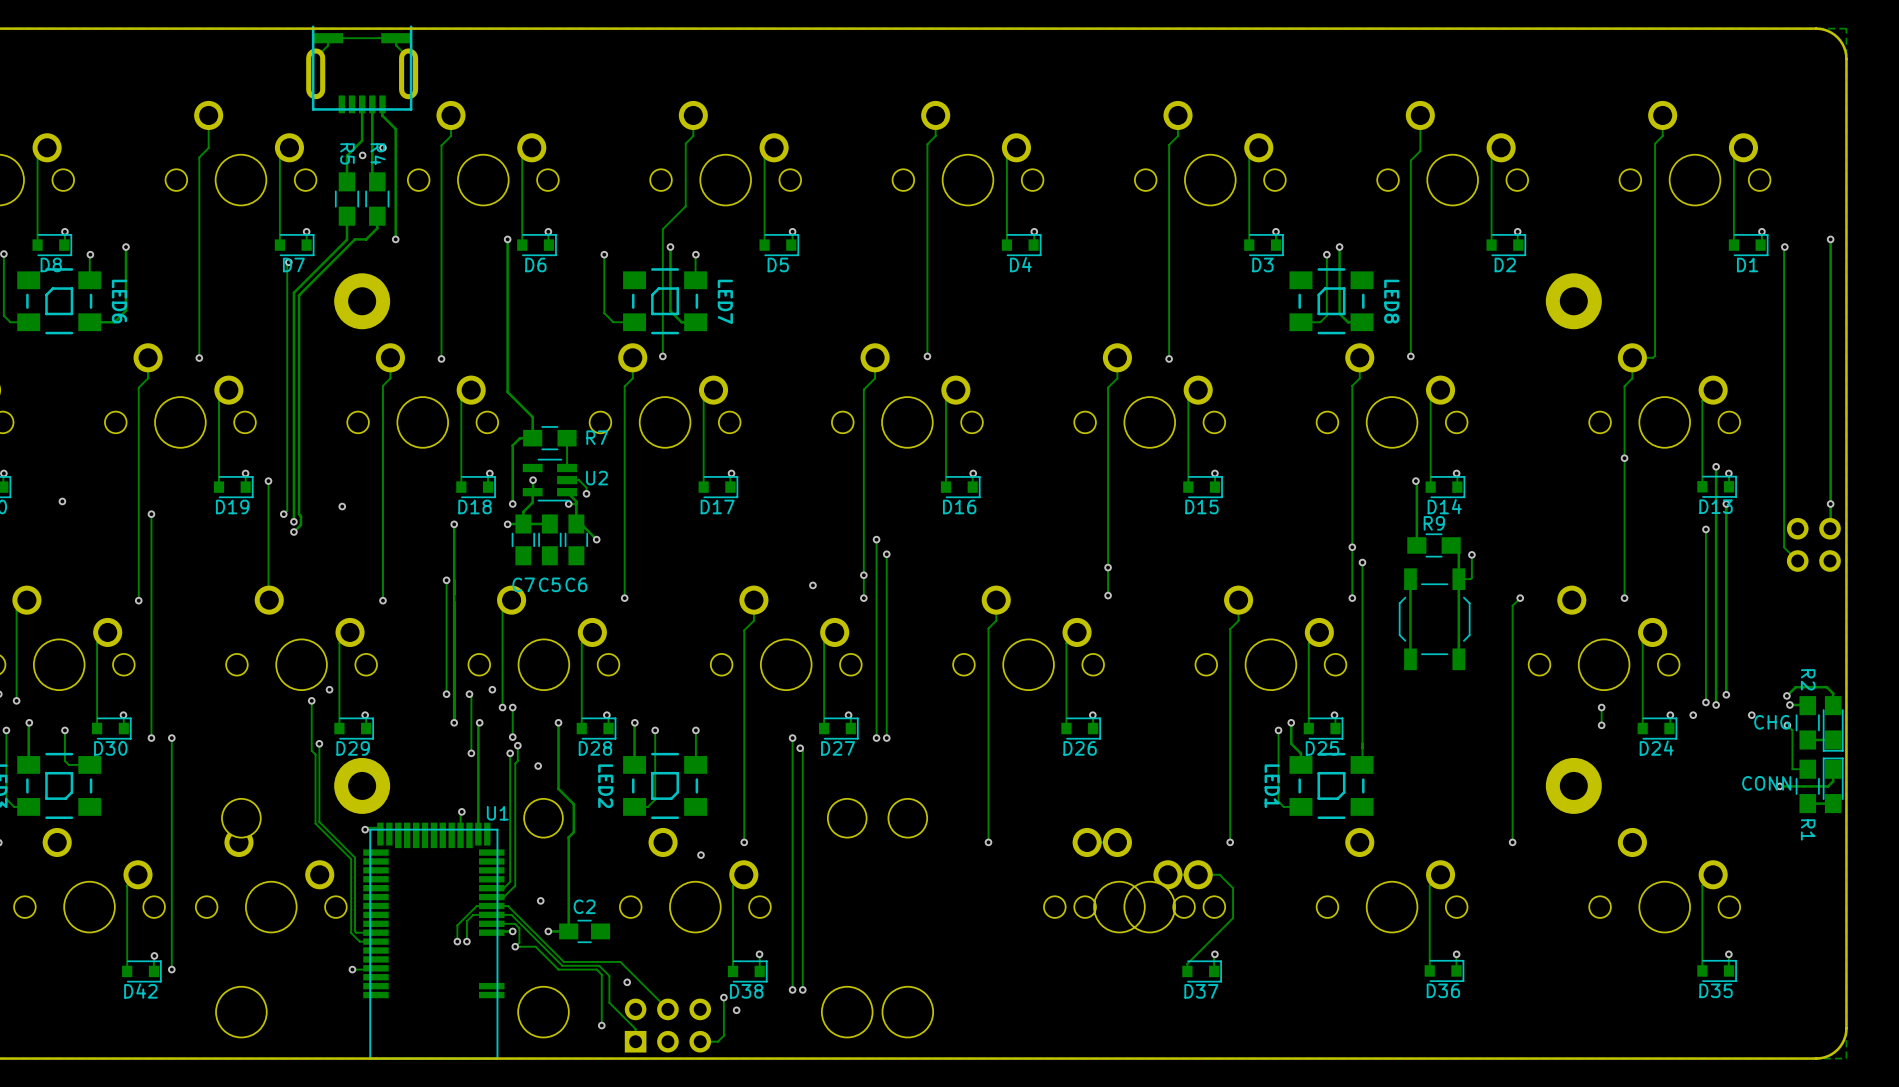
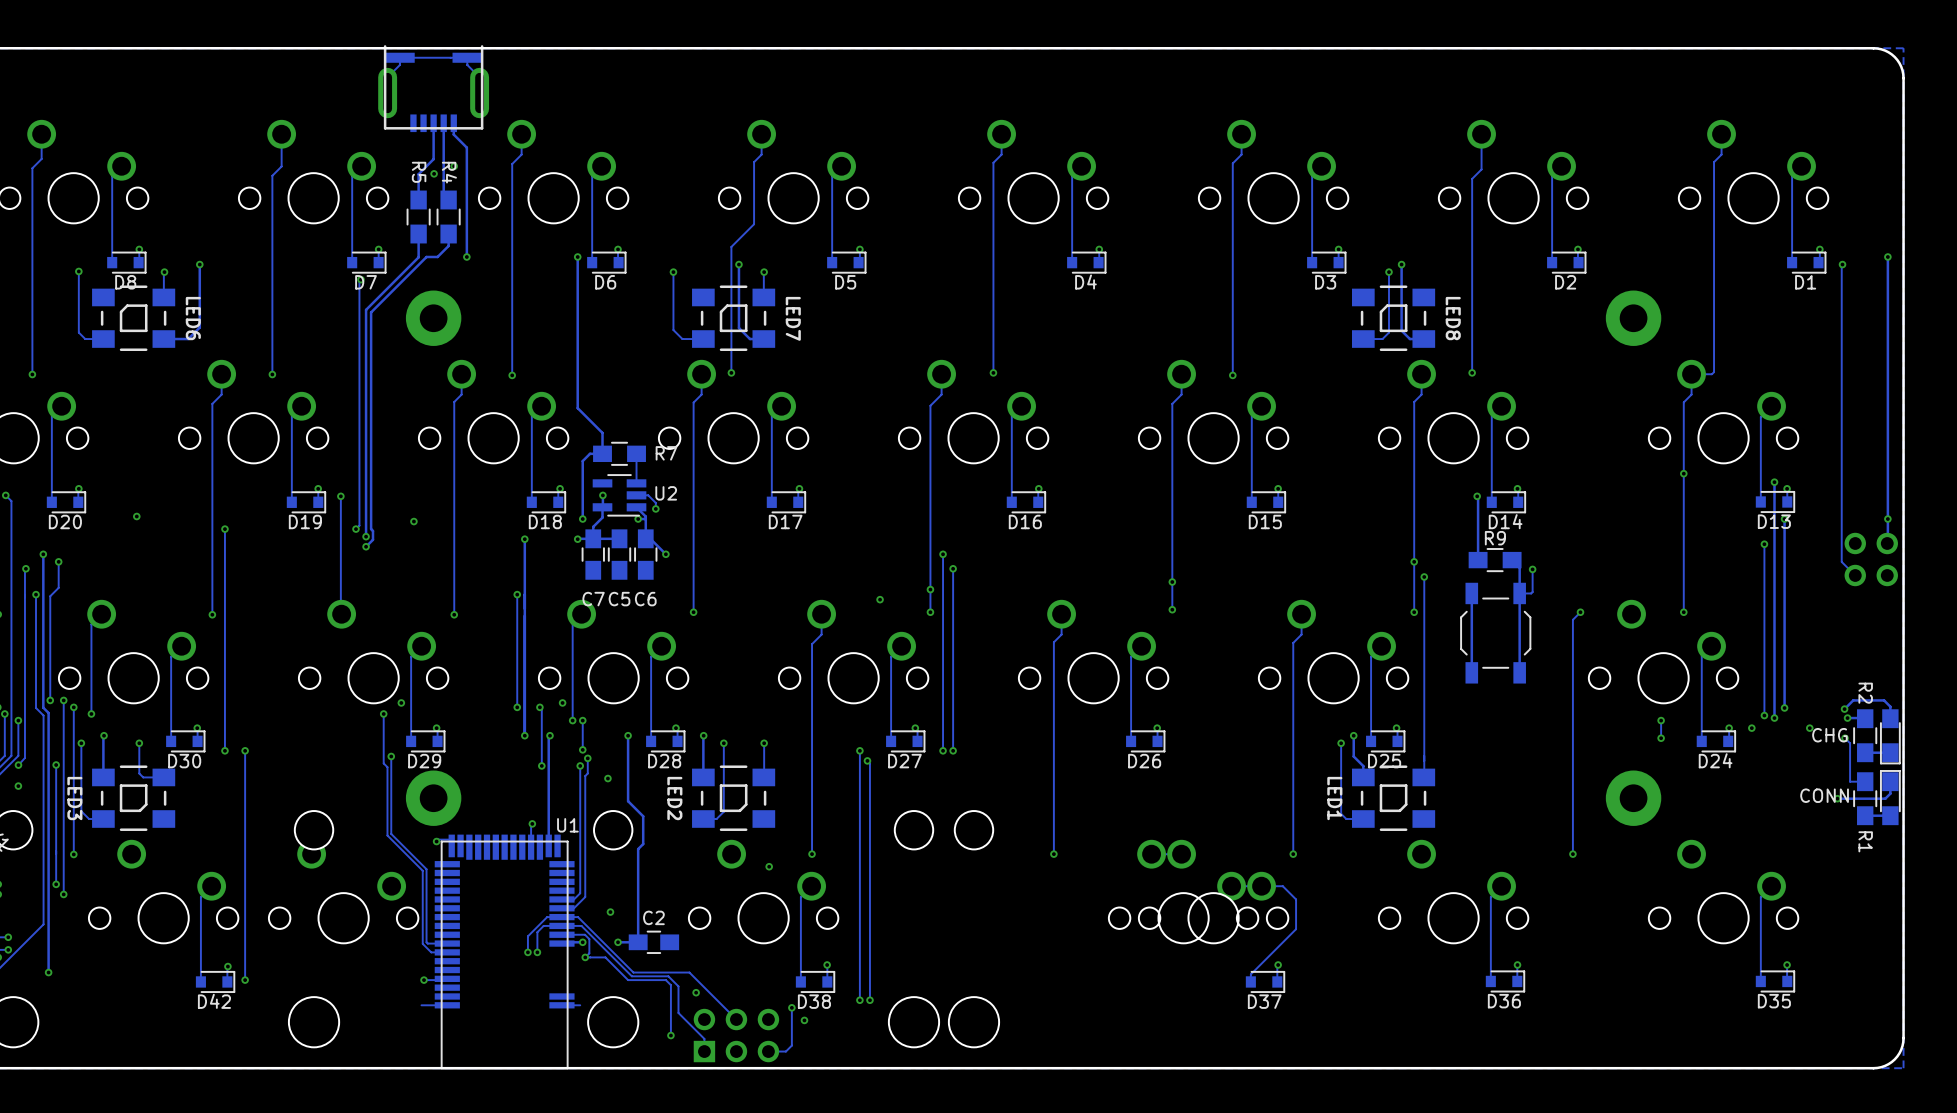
track: none -> (439, 1005) (421, 1005)
track: none -> (580, 1005) (569, 1005)

